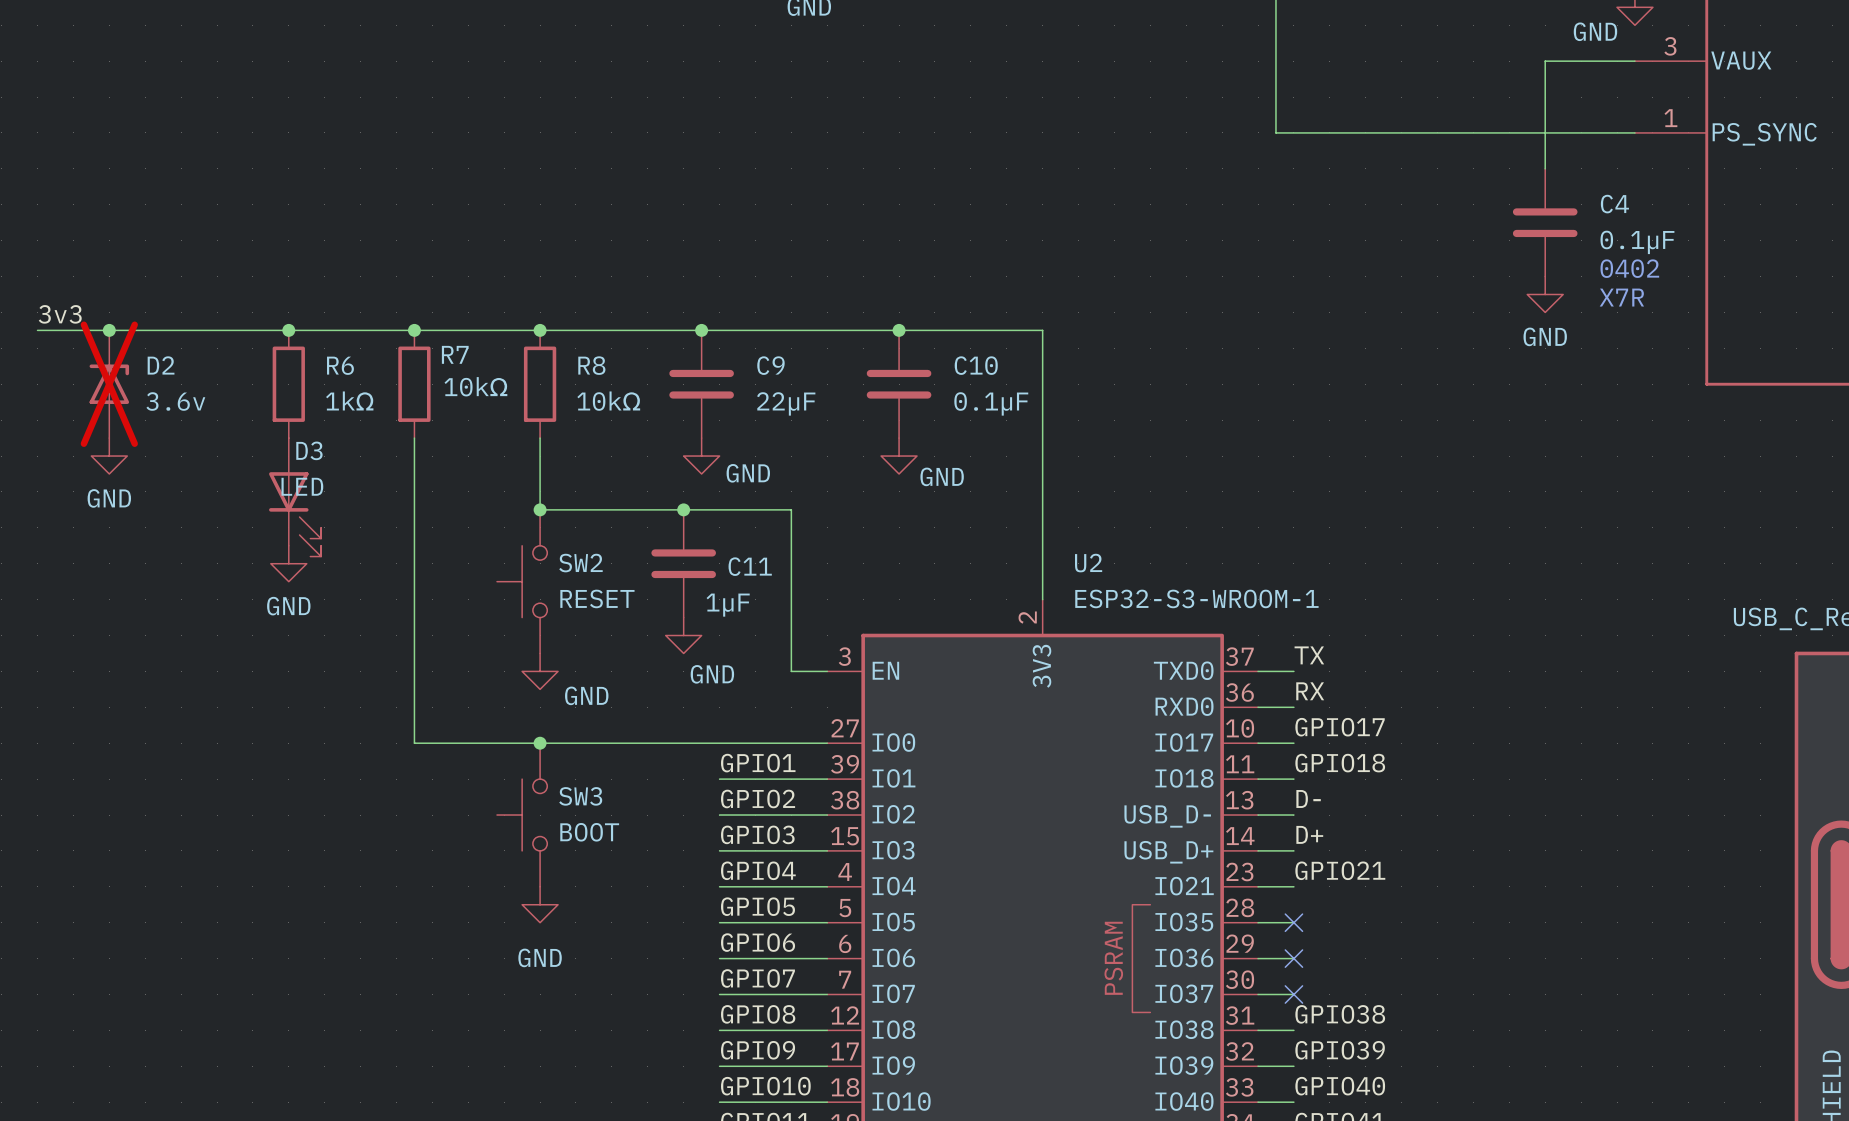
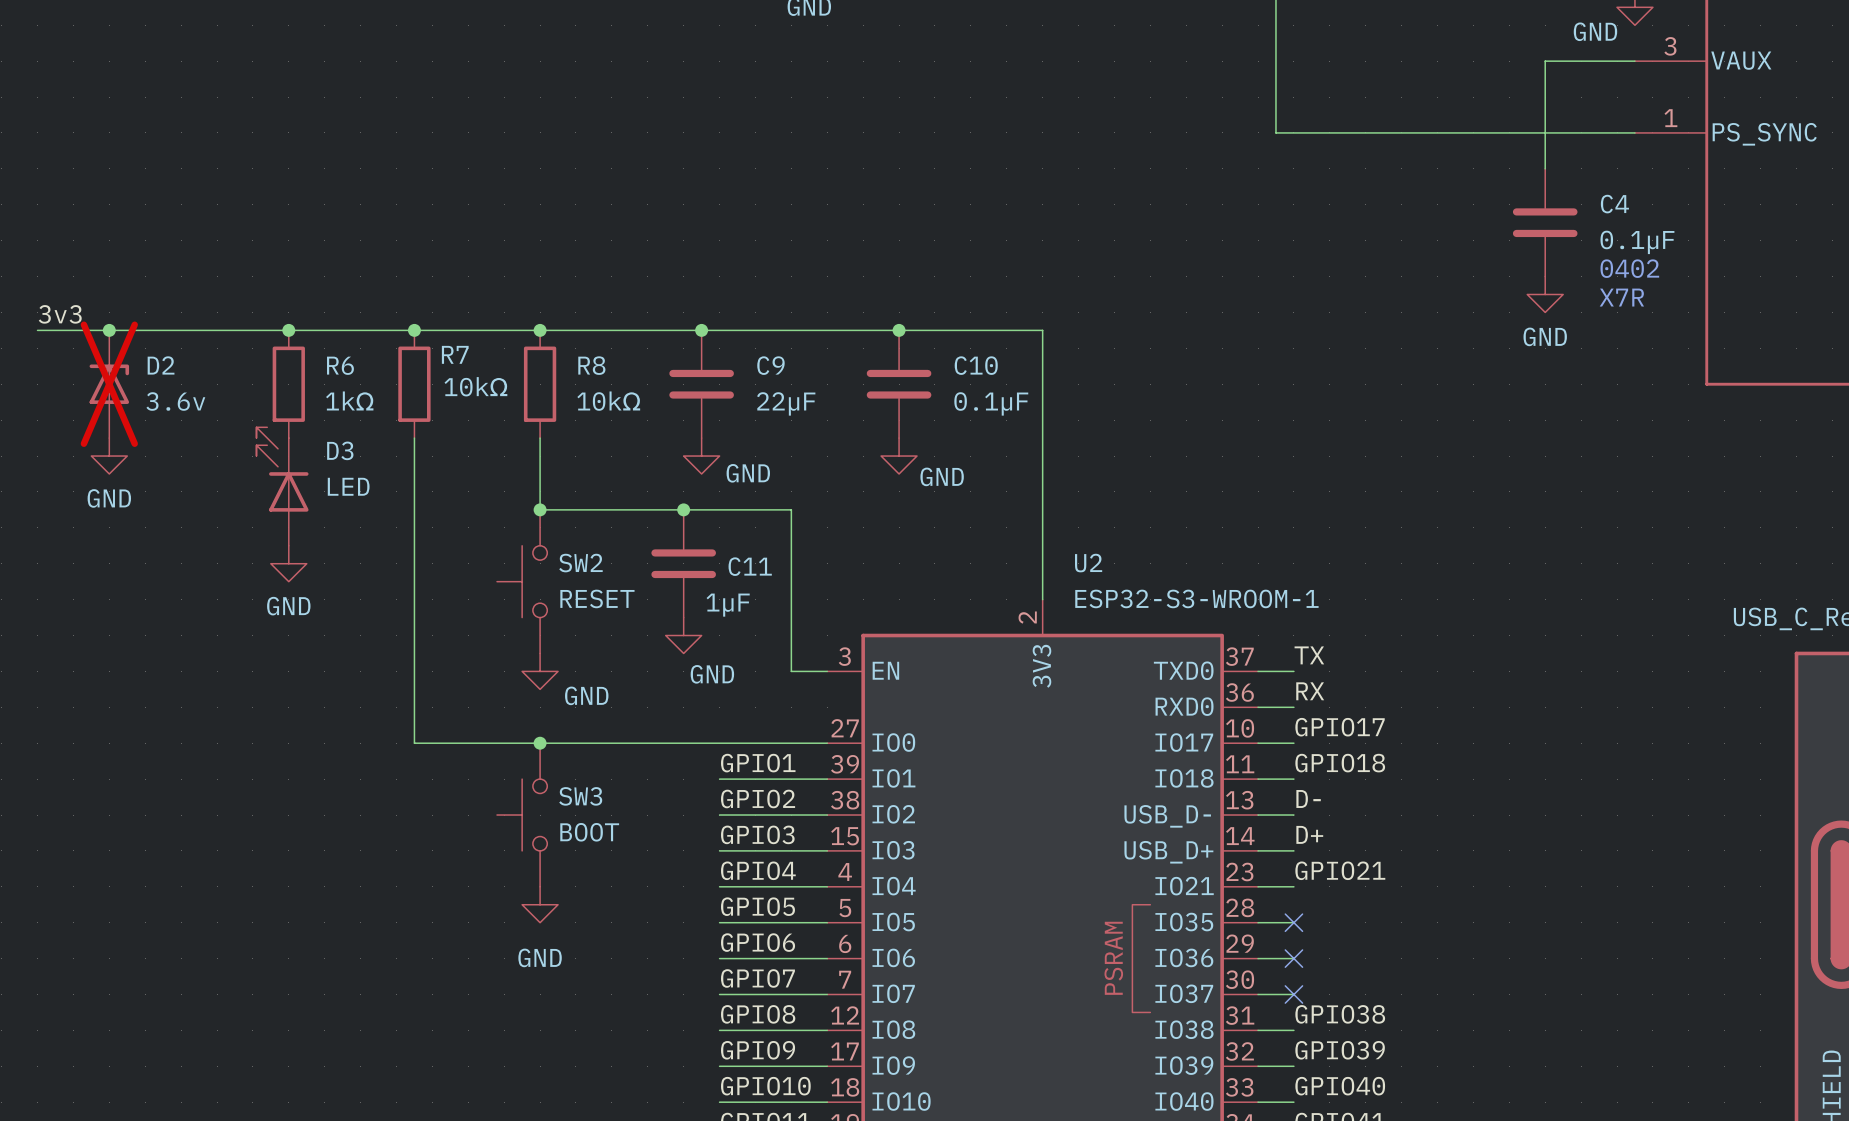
D3 name position: D3 (309, 450) -> D3 (340, 450)
D3 value position: LED (302, 486) -> LED (348, 486)
D3 rotation: 0° (295, 514) -> 180° (282, 469)

